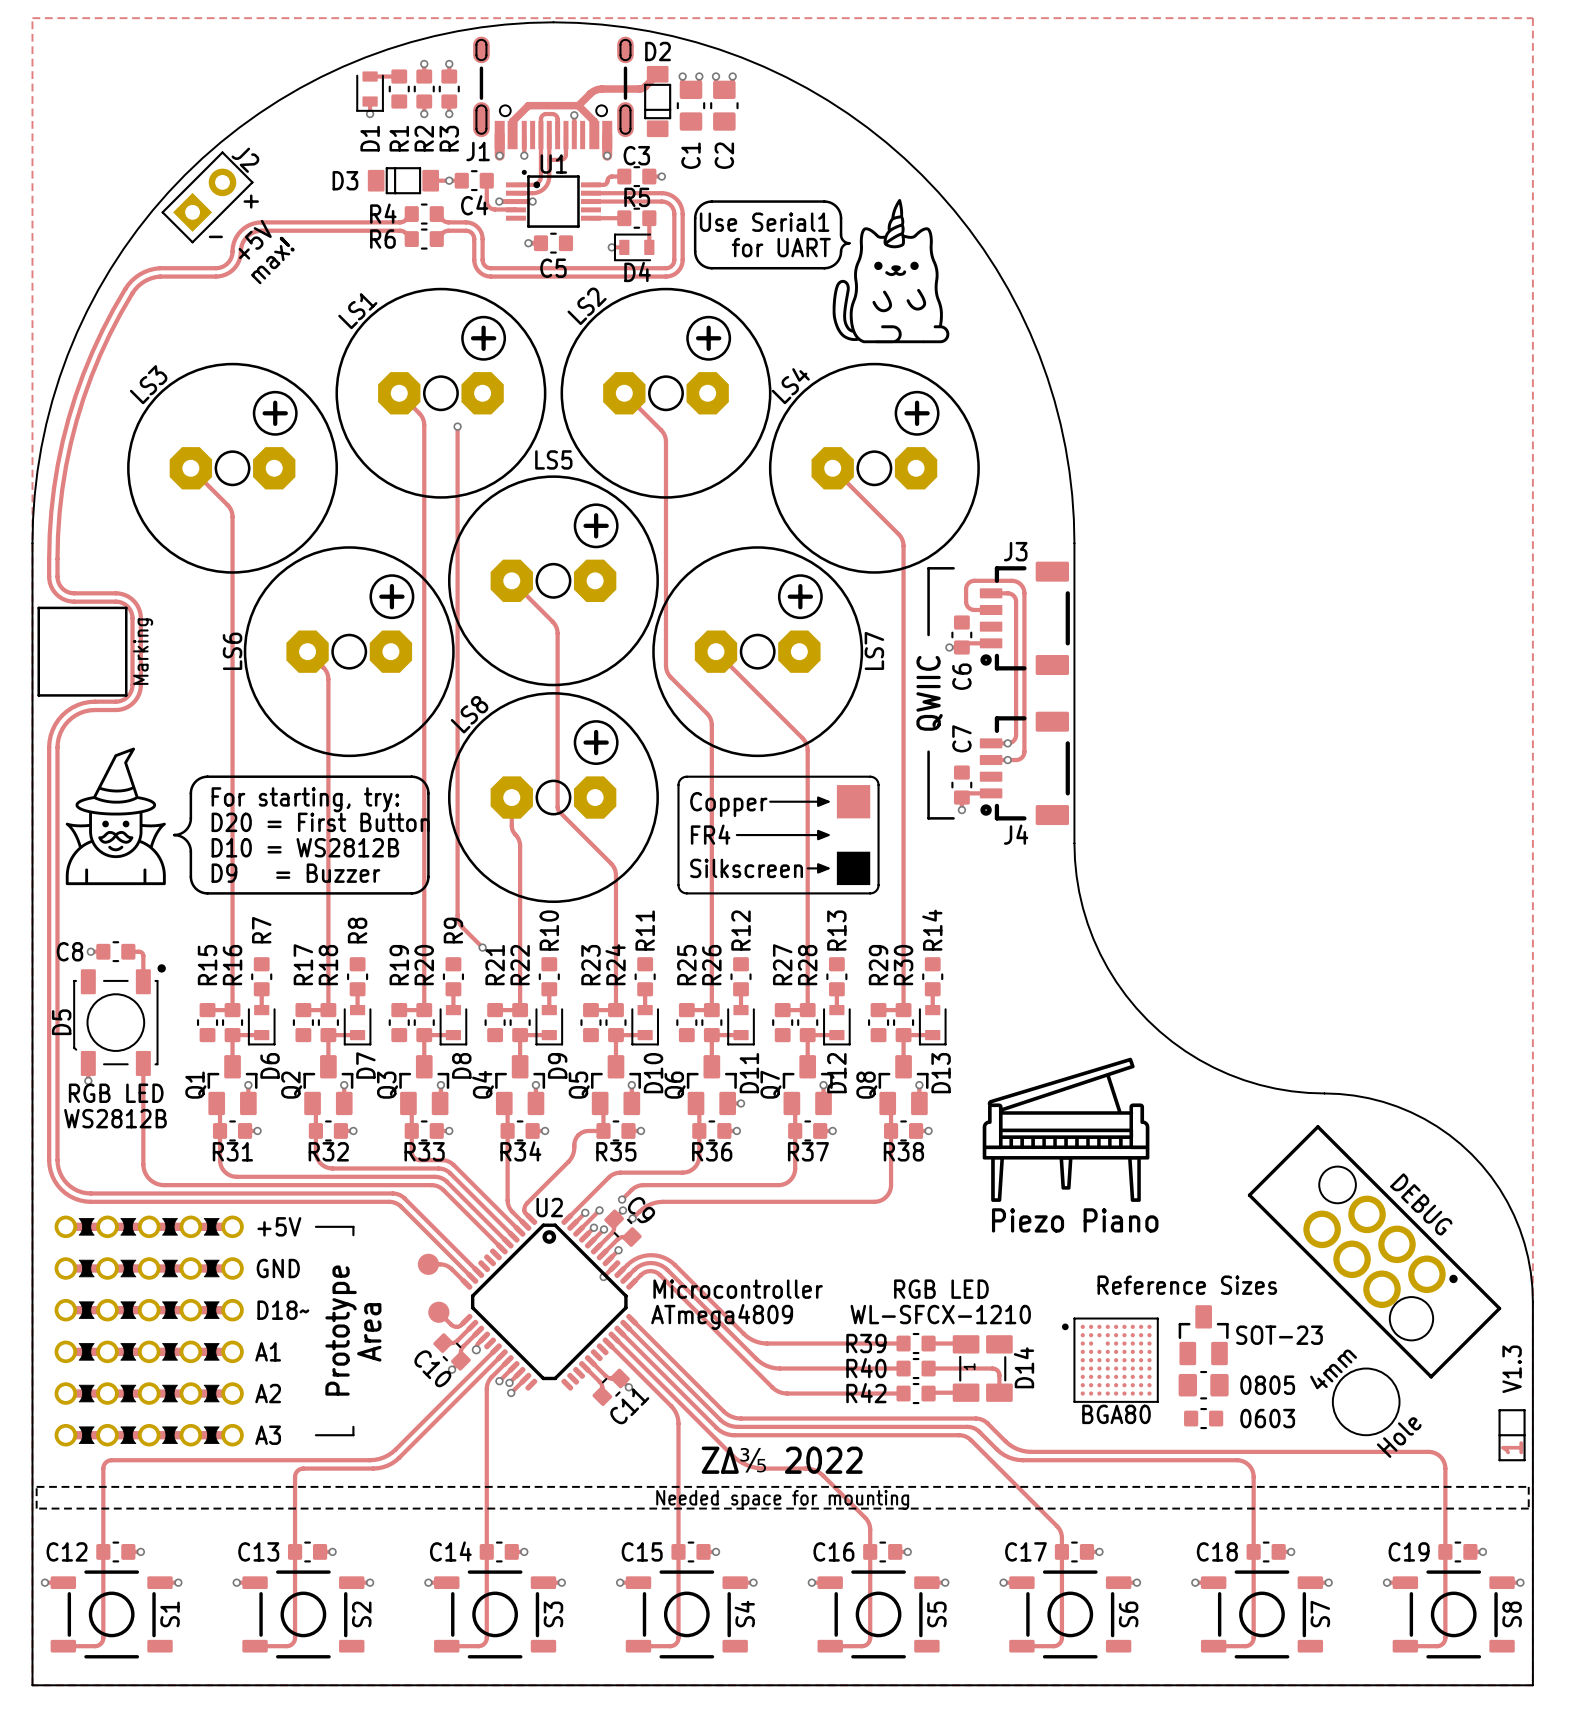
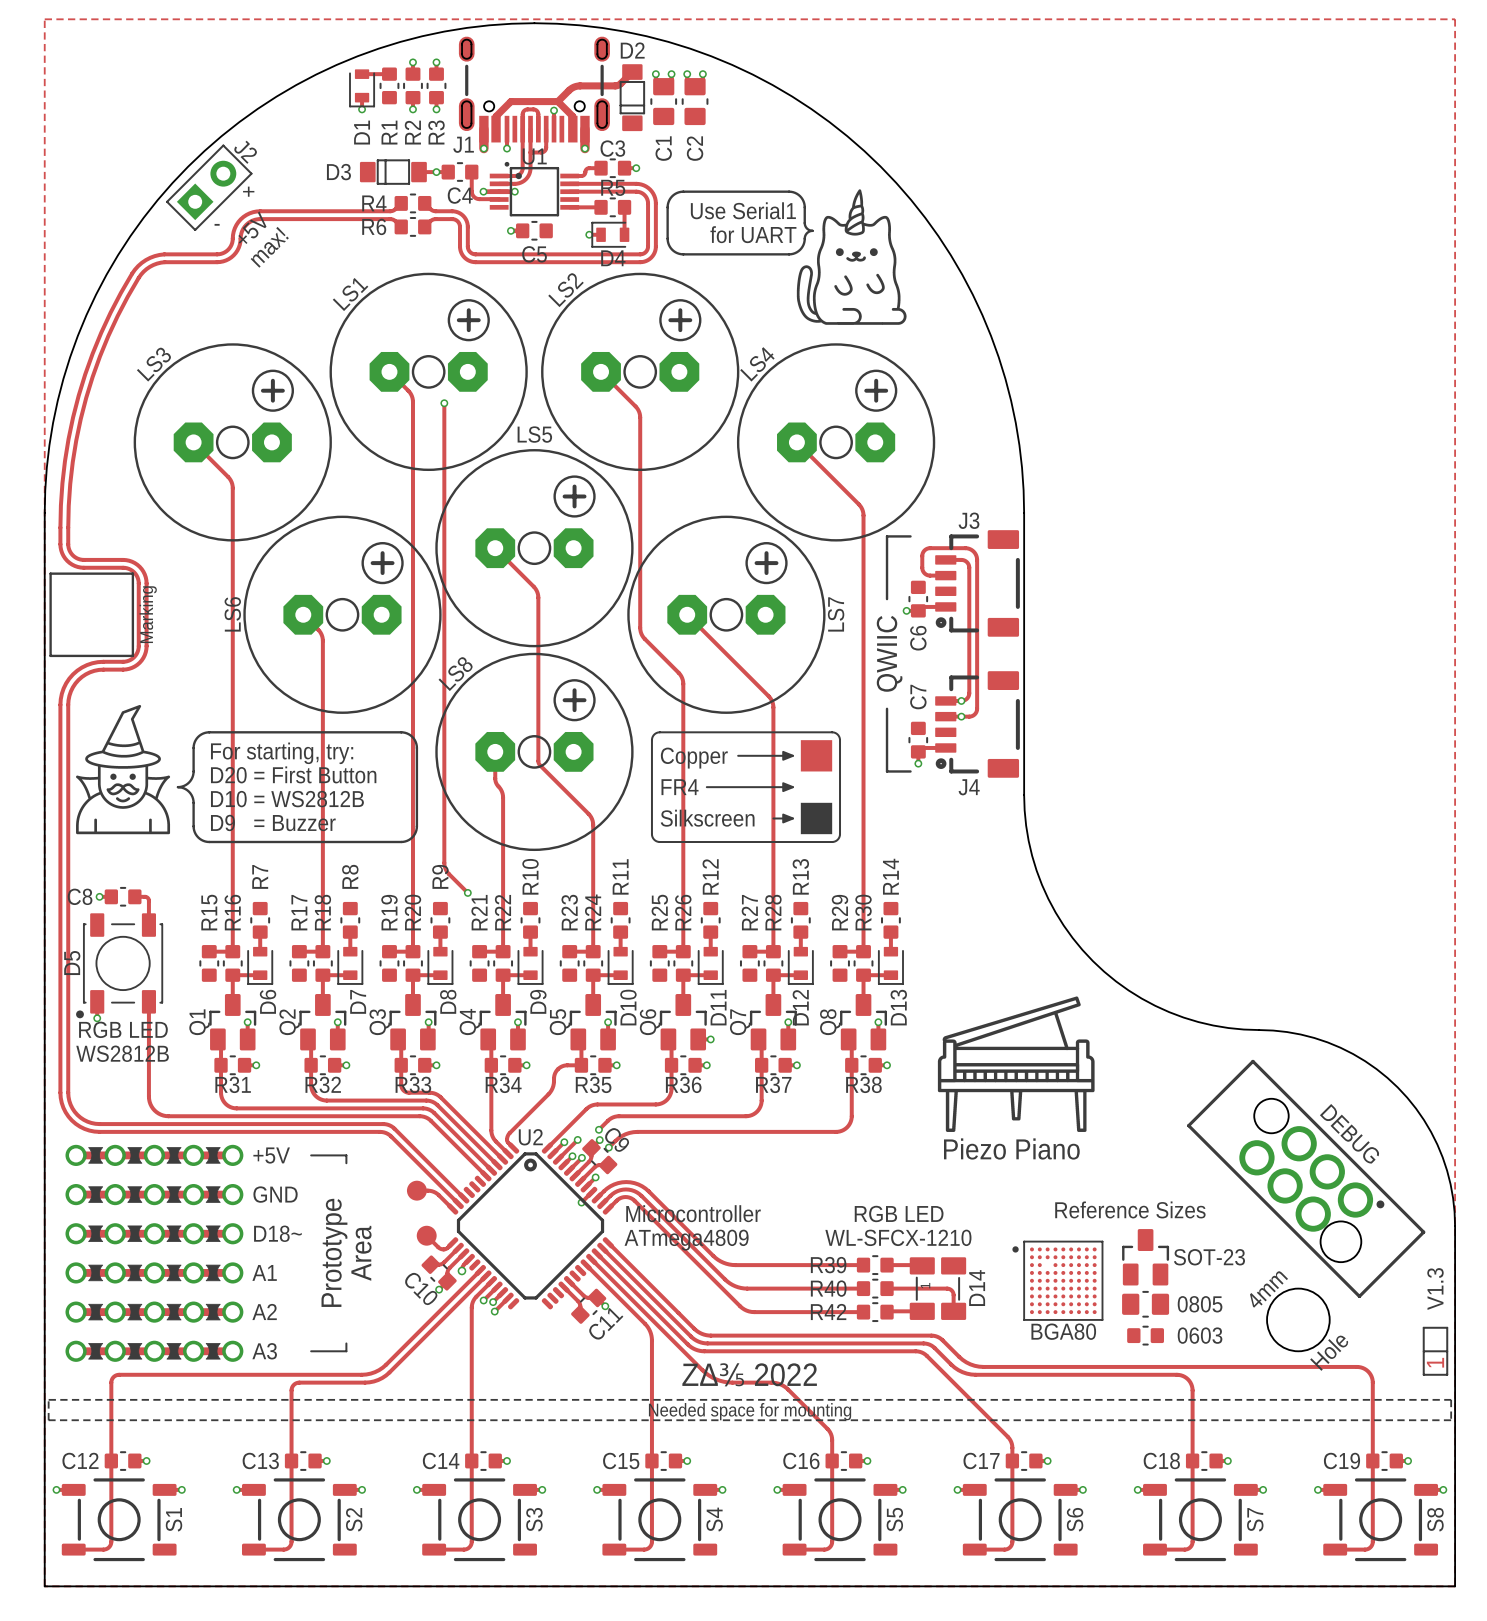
D5 footprint: [73, 964, 166, 1076] -> [76, 913, 164, 1019]

